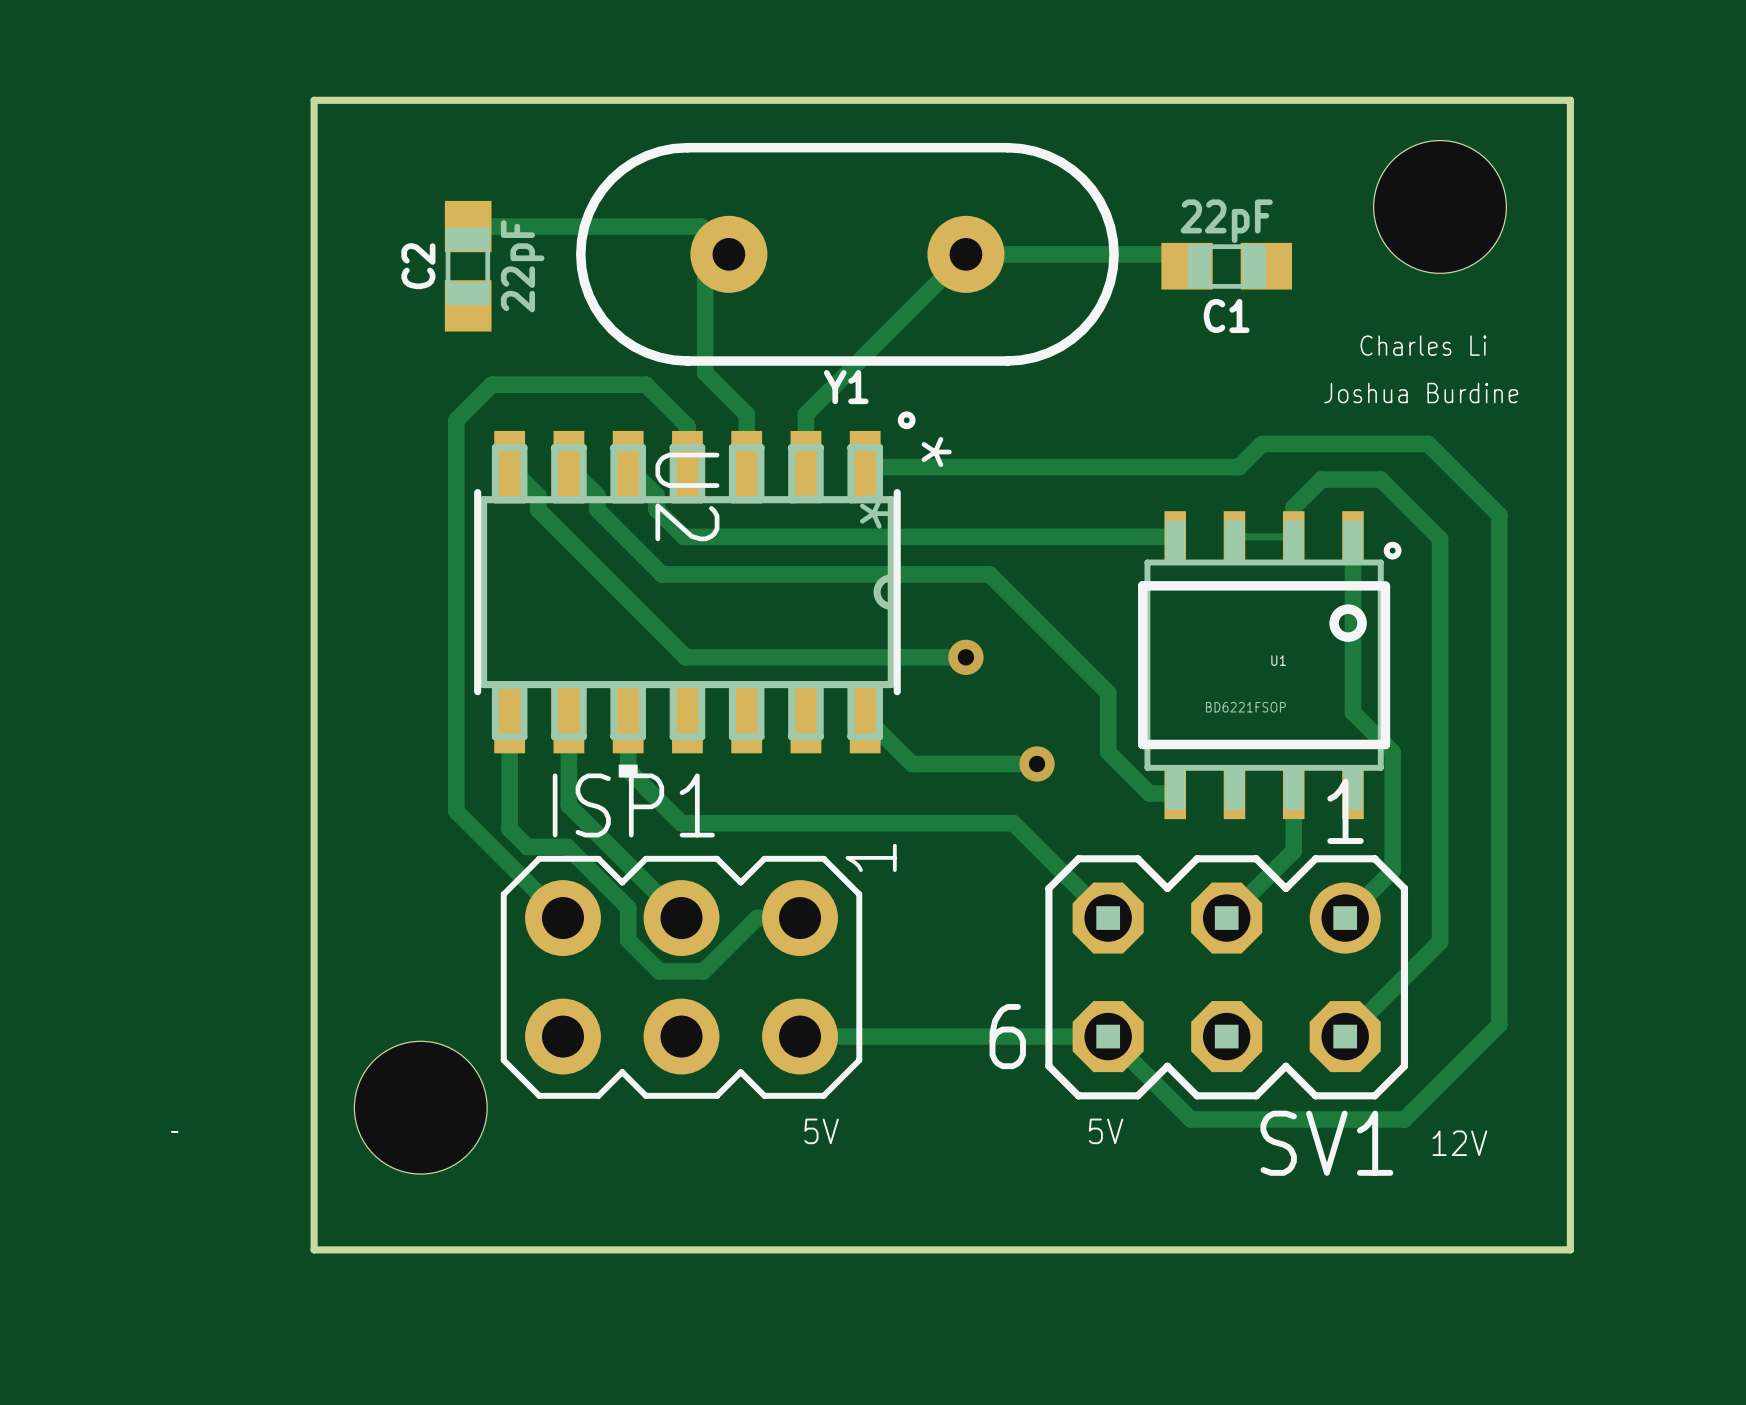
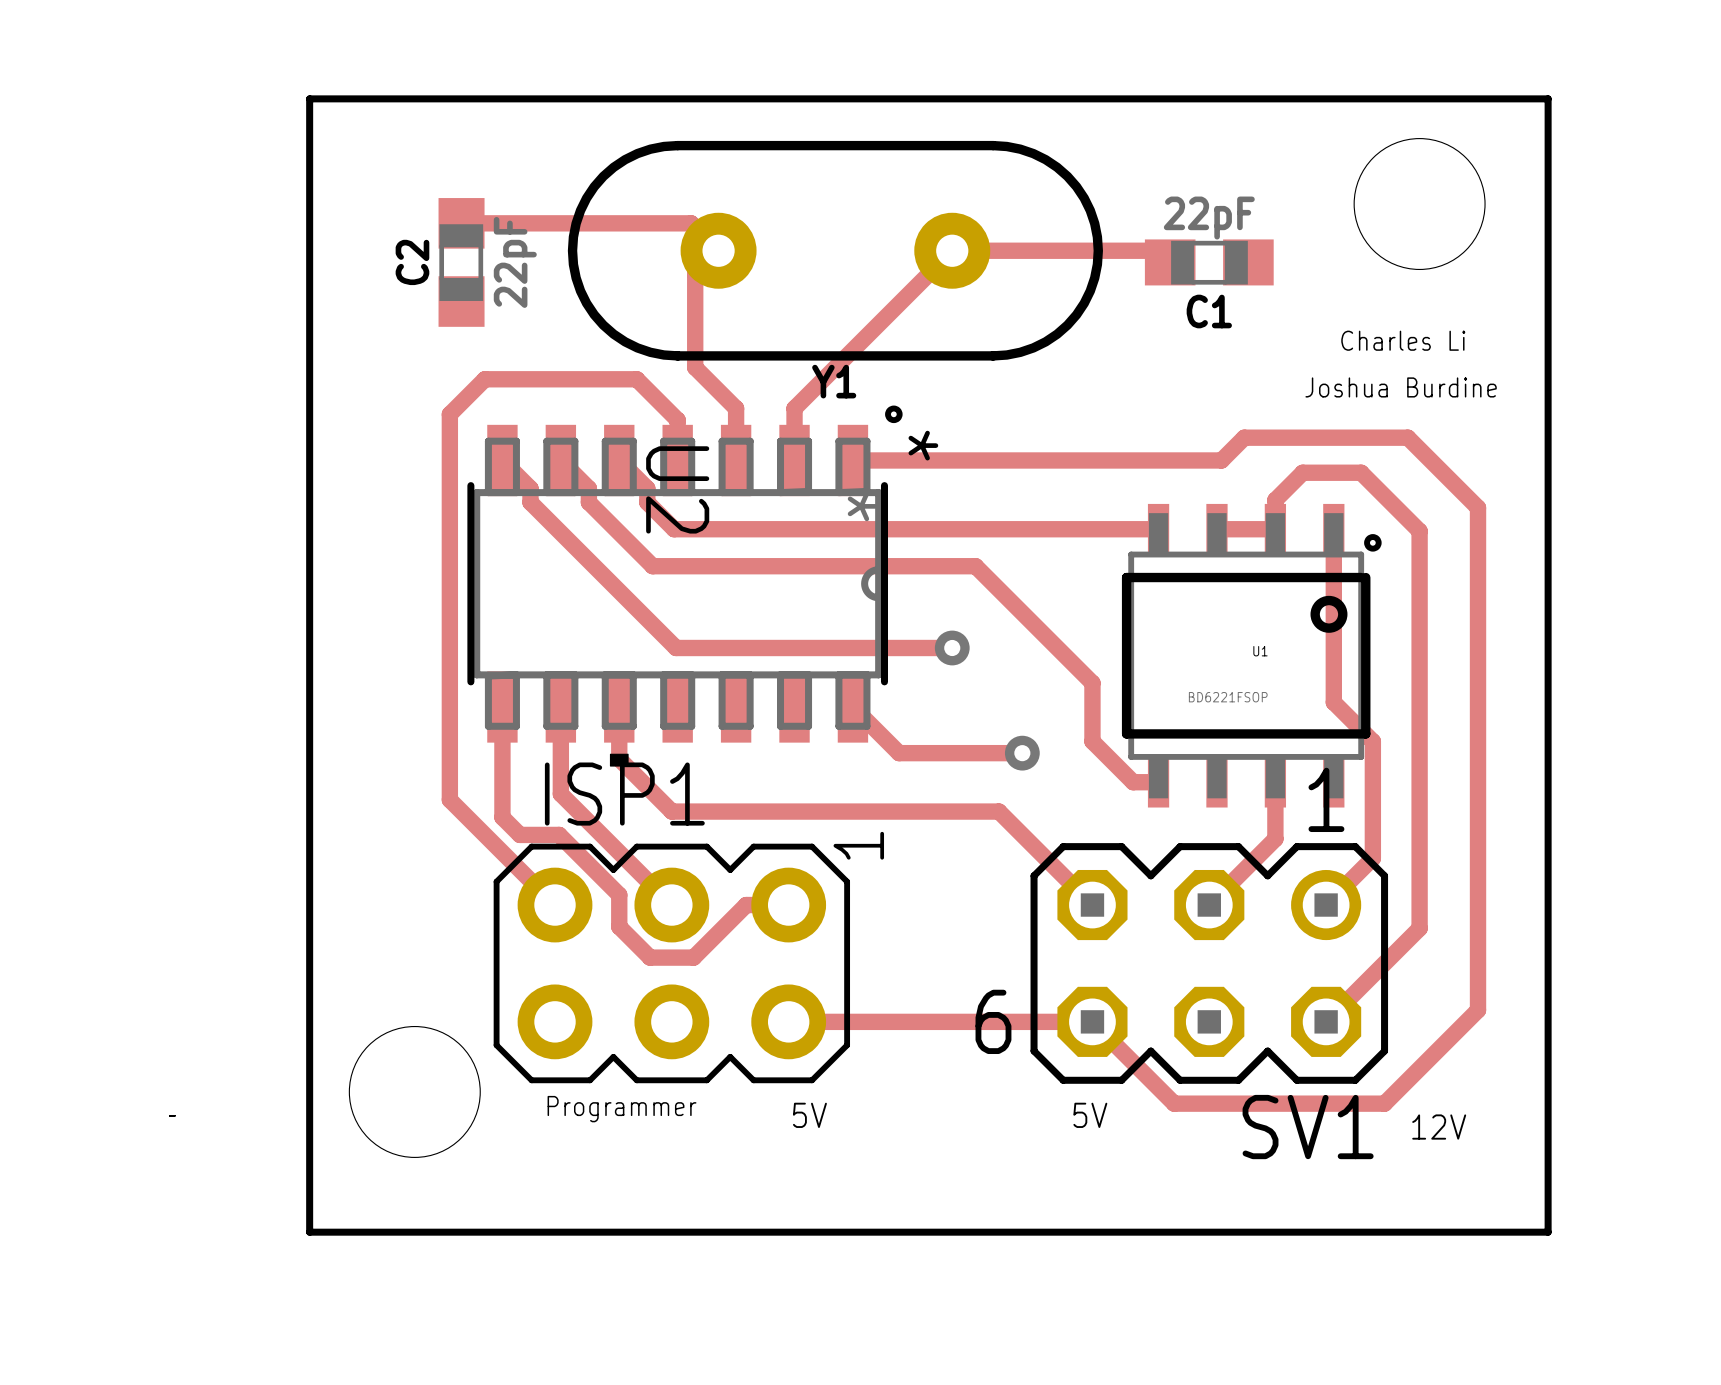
track width: thin (1234, 536) (1293, 536) -> thick (1216, 529) (1275, 529)
text: none -> Programmer (622, 1109)

